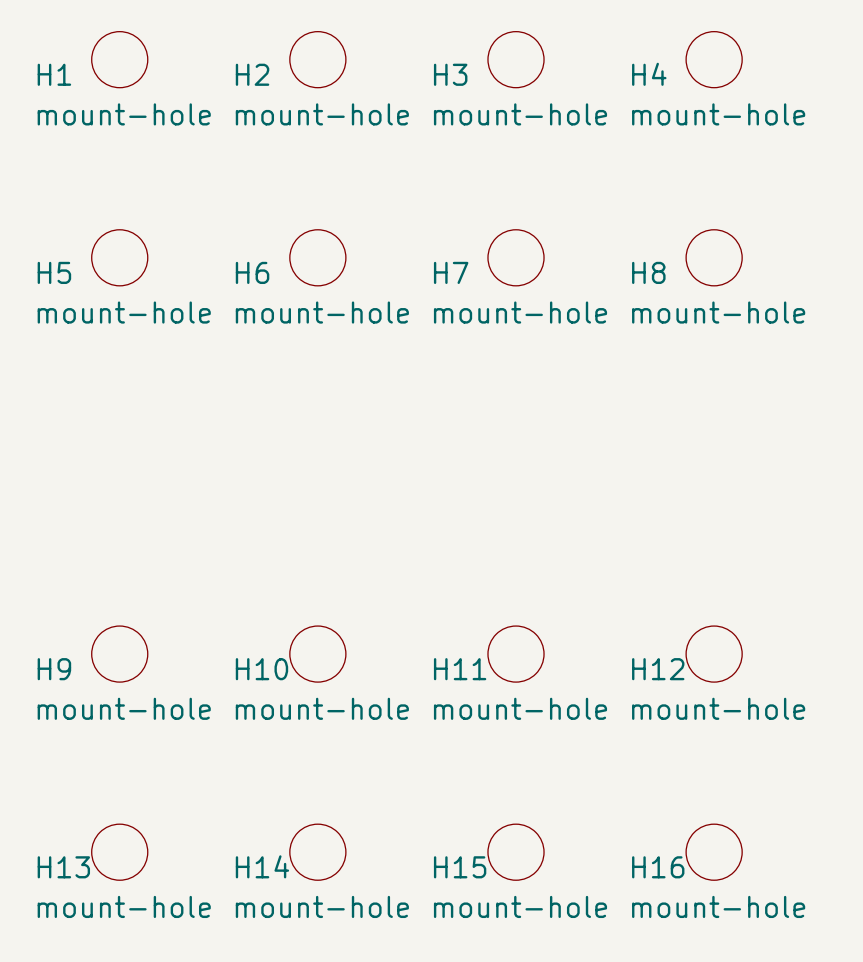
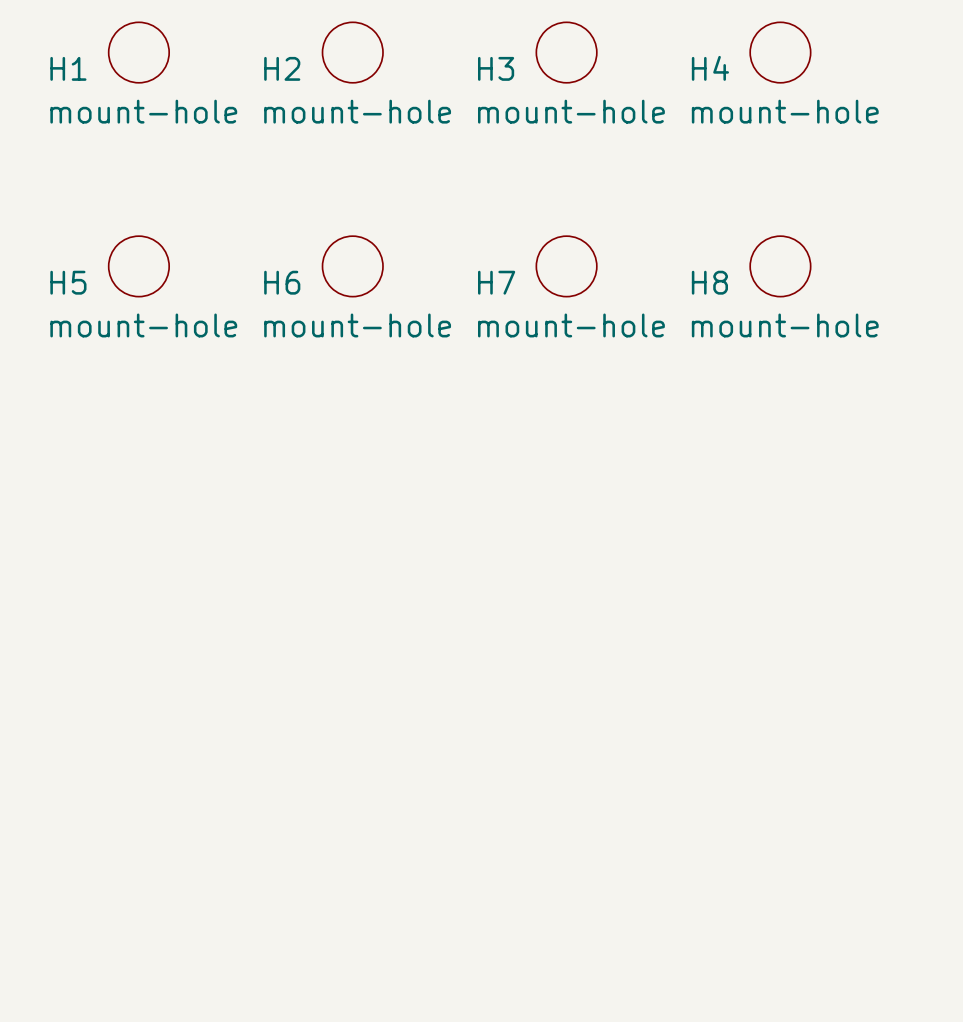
H9: mount-hole (119, 654) -> none
H10: mount-hole (317, 654) -> none
H11: mount-hole (516, 654) -> none
H12: mount-hole (714, 654) -> none
H13: mount-hole (119, 852) -> none
H14: mount-hole (317, 852) -> none
H15: mount-hole (516, 852) -> none
H16: mount-hole (714, 852) -> none

